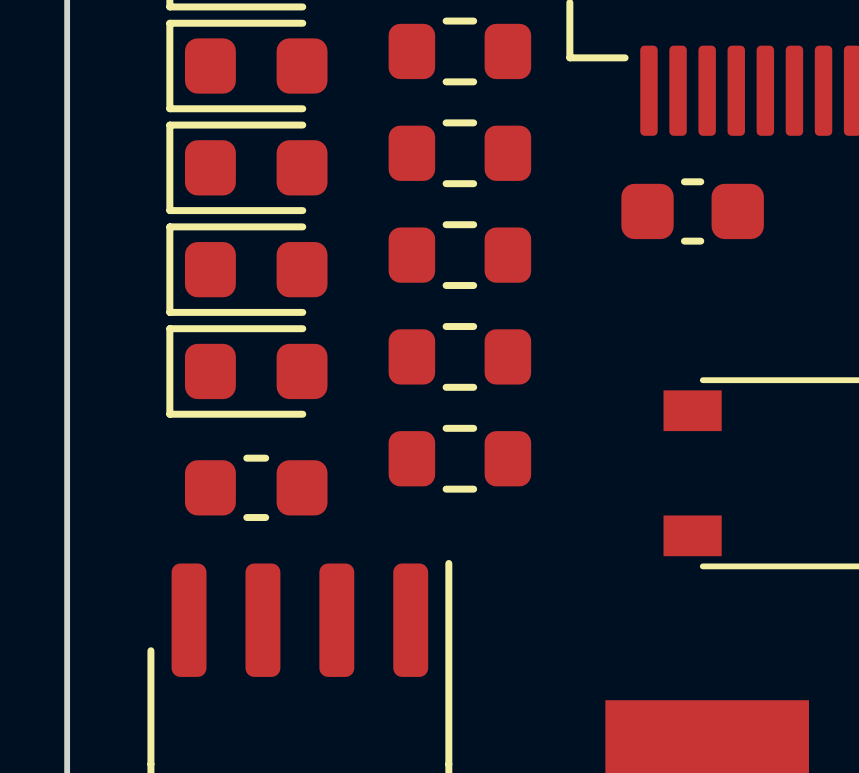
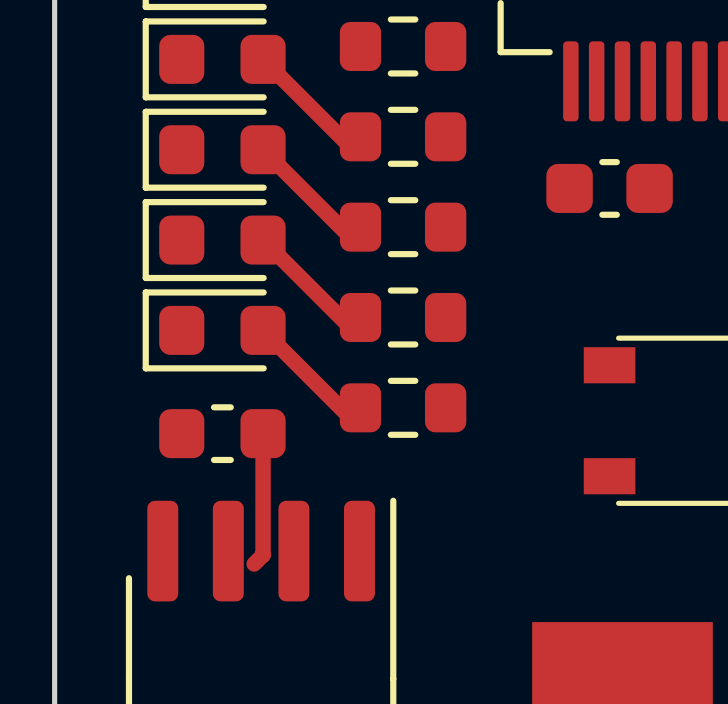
top track: none -> (263, 59) (353, 149) (360, 149)
top track: none -> (263, 149) (353, 240) (360, 240)
top track: none -> (263, 240) (353, 330) (360, 330)
top track: none -> (263, 330) (353, 420) (360, 420)
top track: none -> (263, 420) (263, 555) (254, 563)

